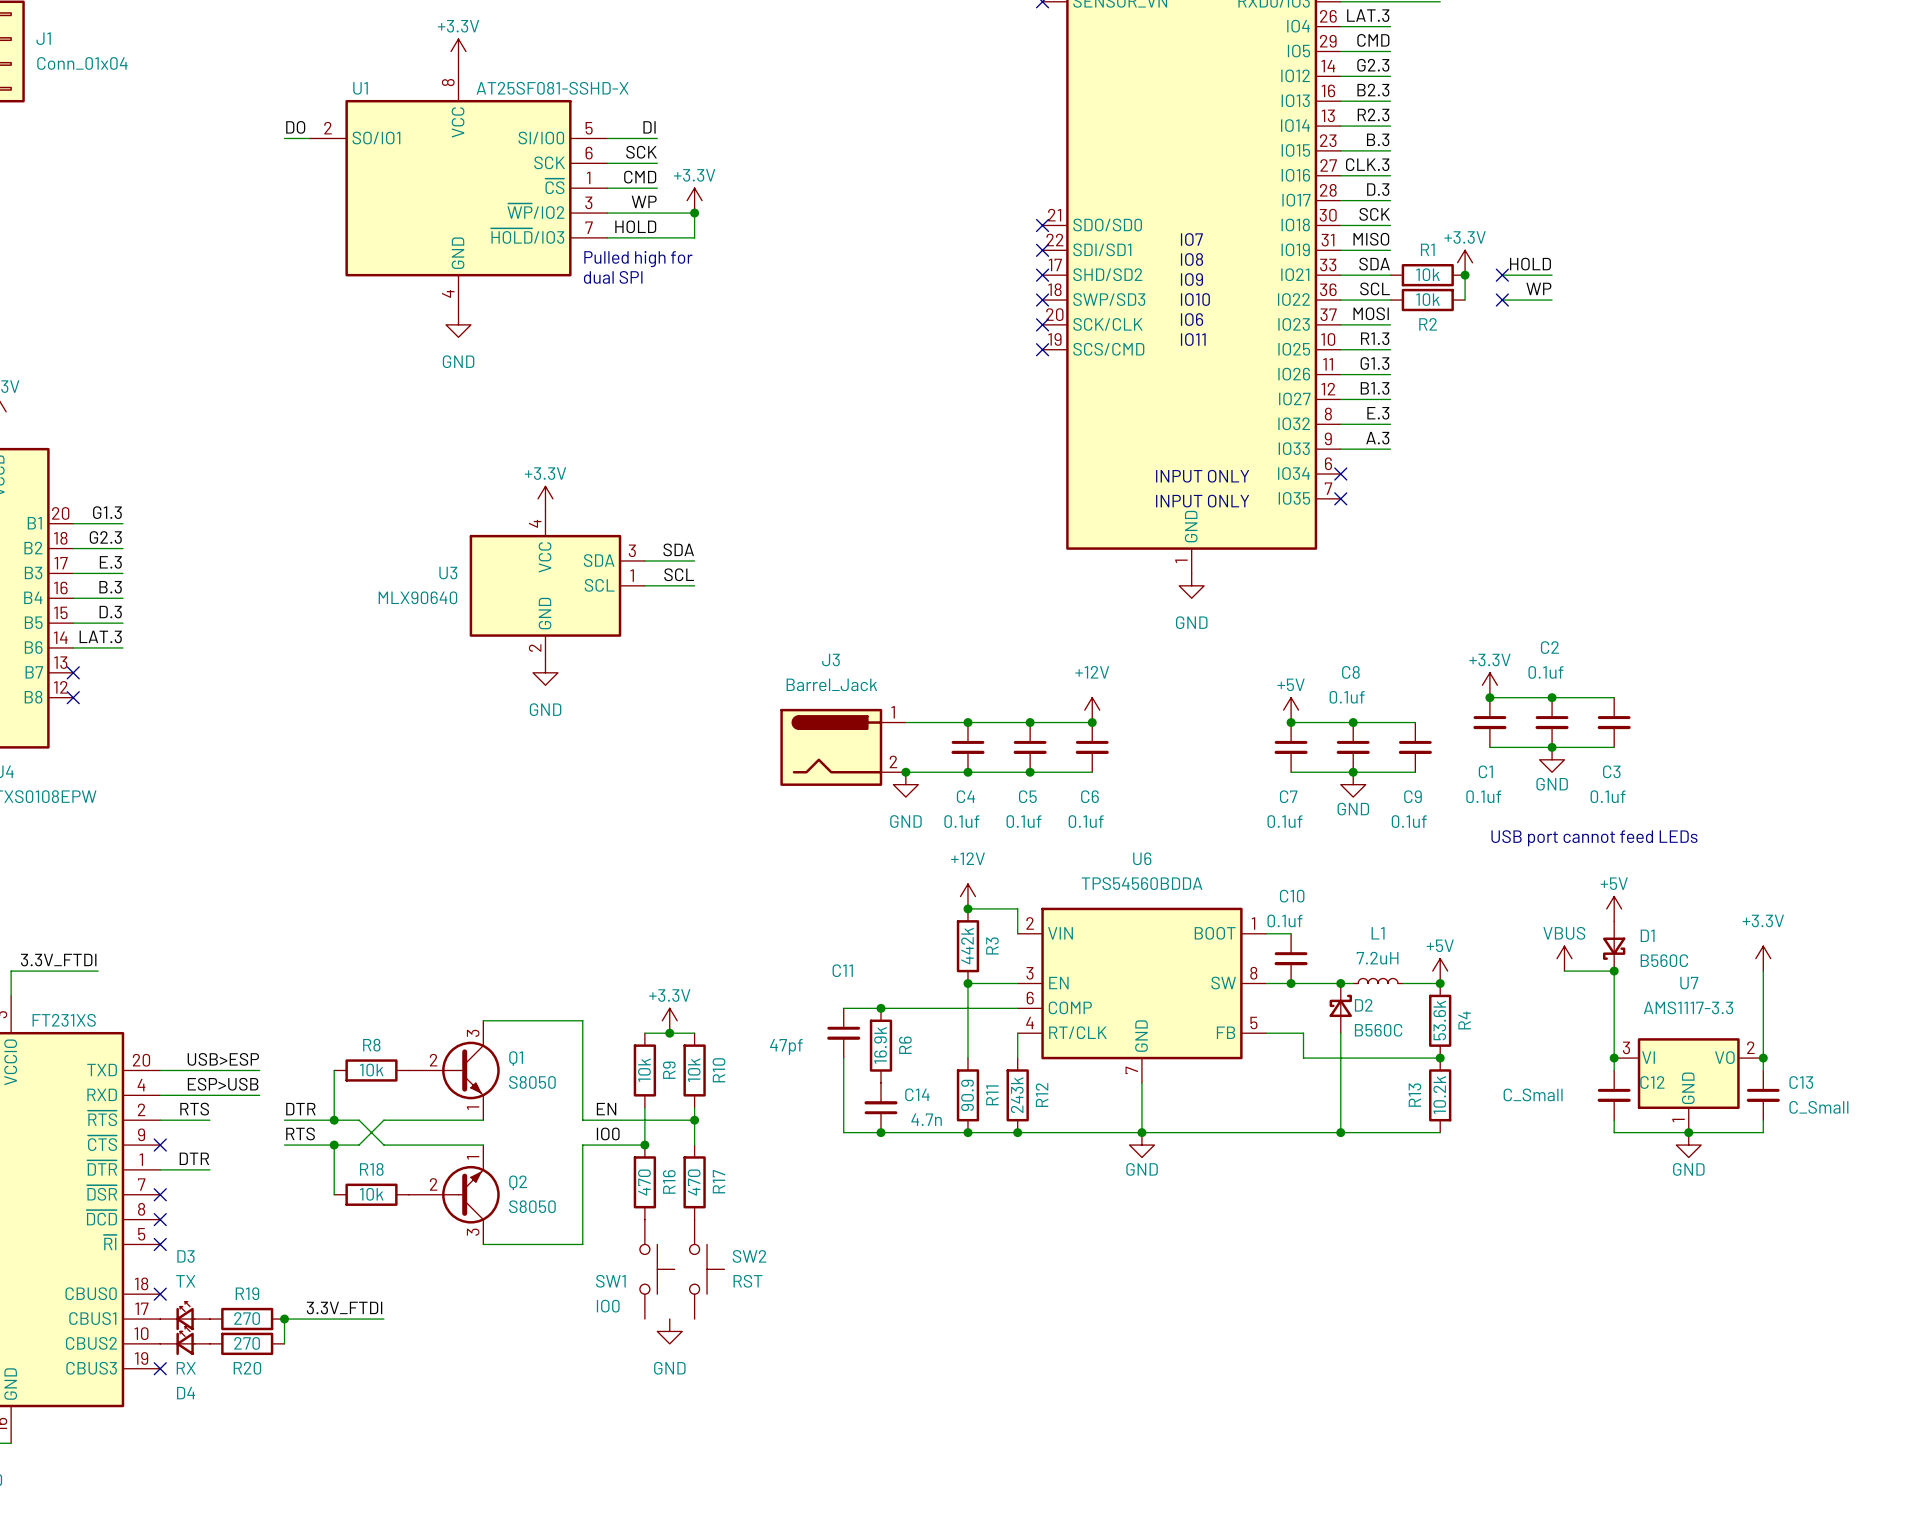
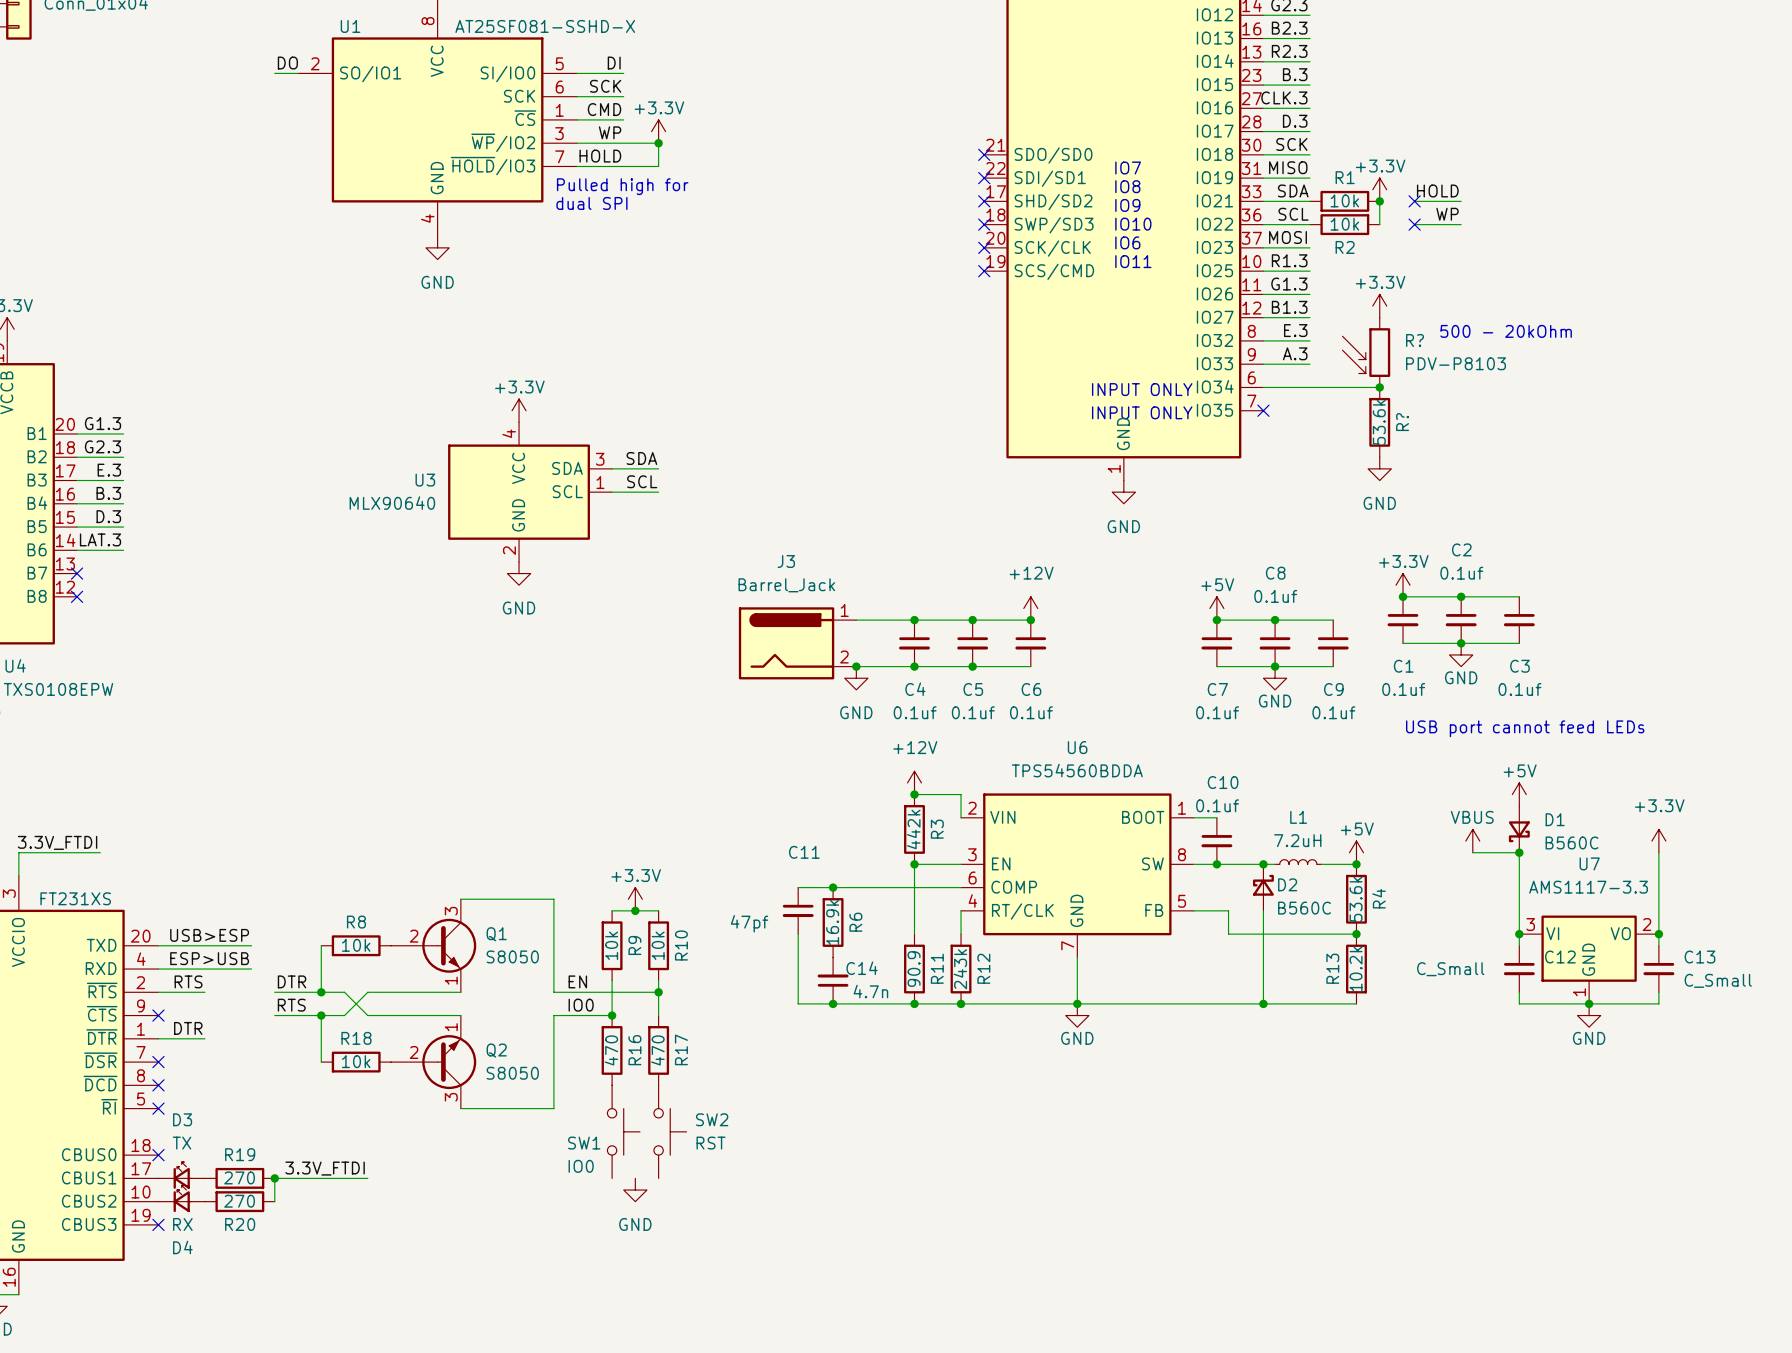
power symbol: none -> +3.3V (1379, 306)
text: none -> 500 - 20kOhm (1506, 331)
R?: none -> PDV-P8103 (1366, 352)
wire: none -> (1263, 387) (1379, 387)
no-connect mark: (1340, 474) -> none
junction: none -> (1379, 387)
R?: none -> 53.6k (1379, 422)
power symbol: none -> GND (1379, 468)

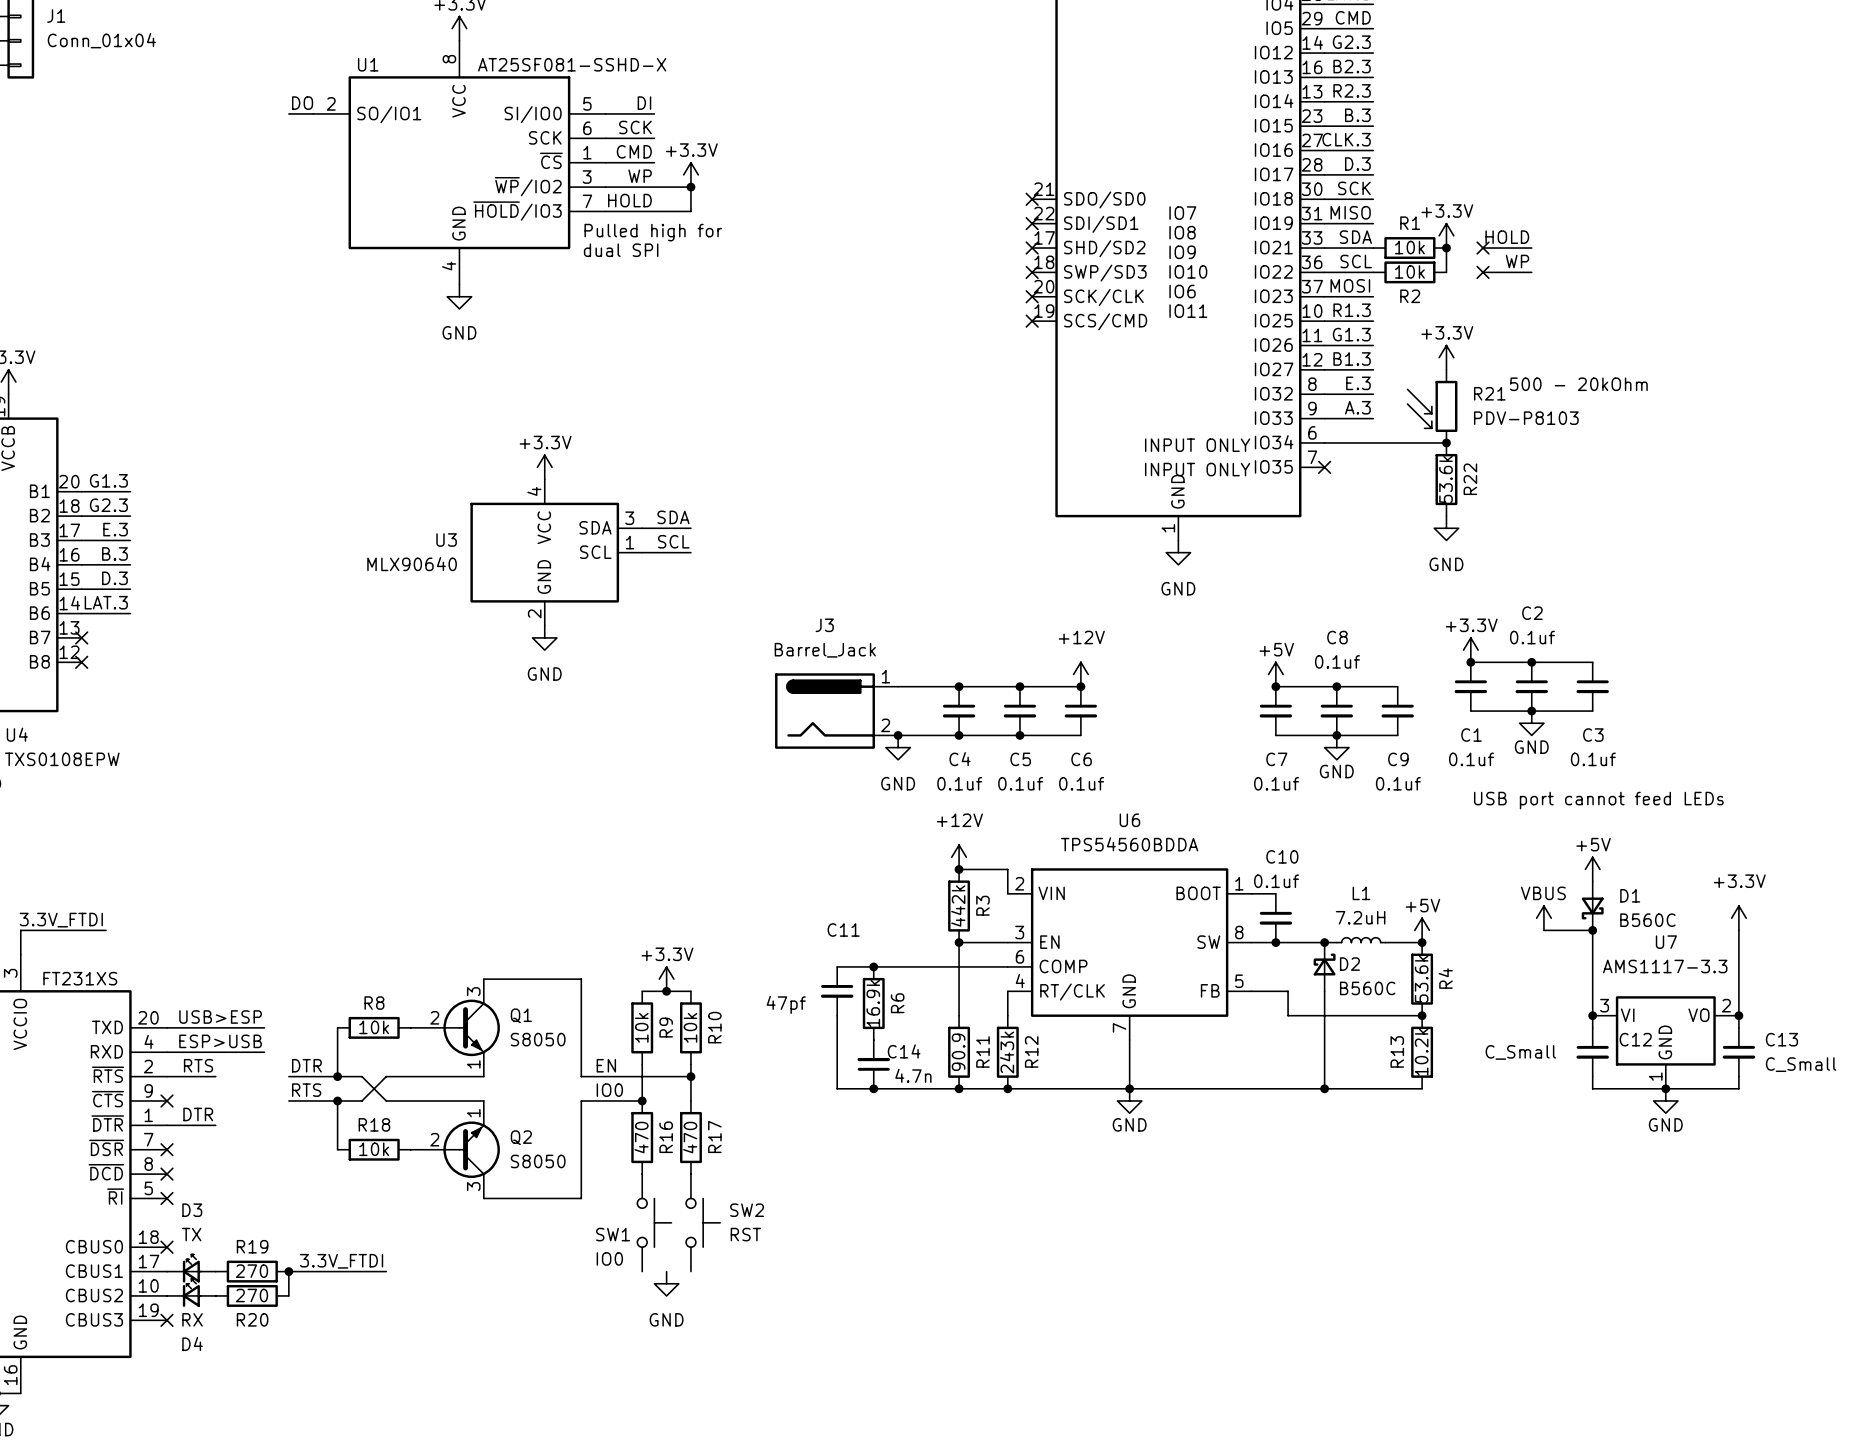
R? name: R? (1415, 340) -> R21 (1489, 393)
R? name: R? (1402, 422) -> R22 (1470, 479)

